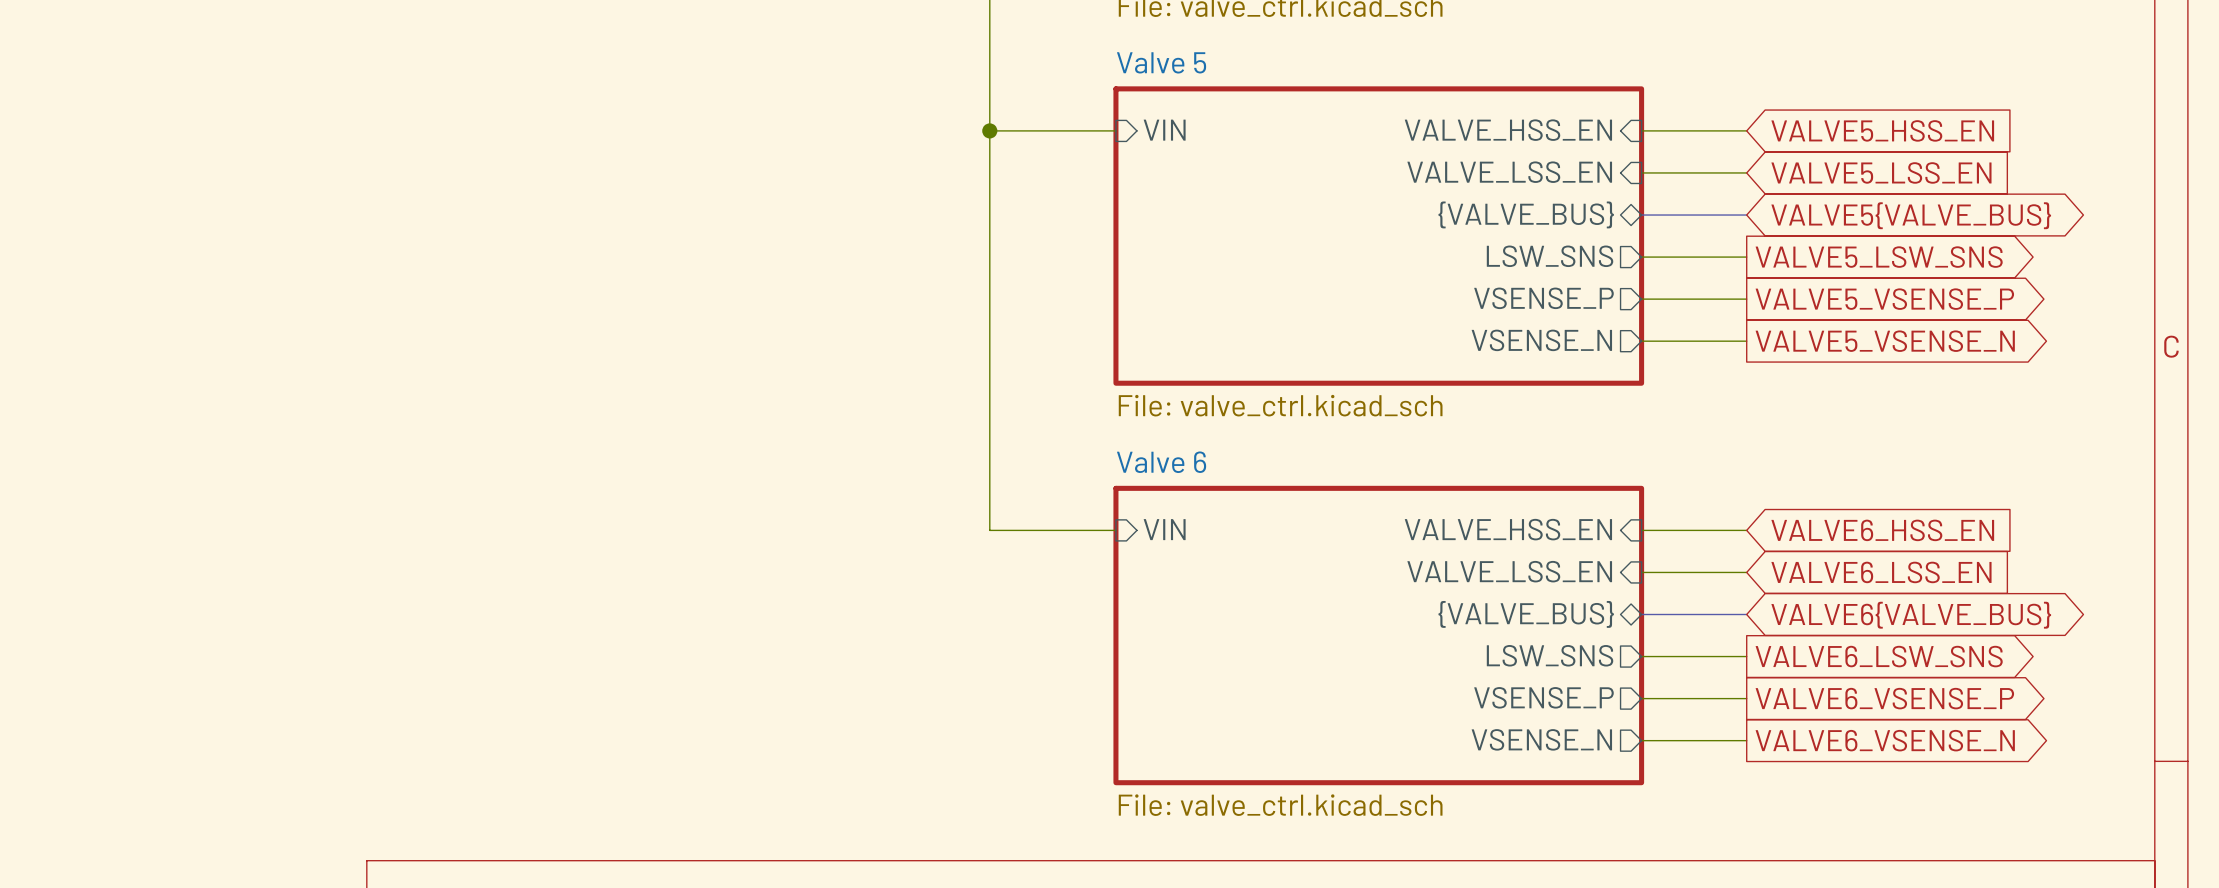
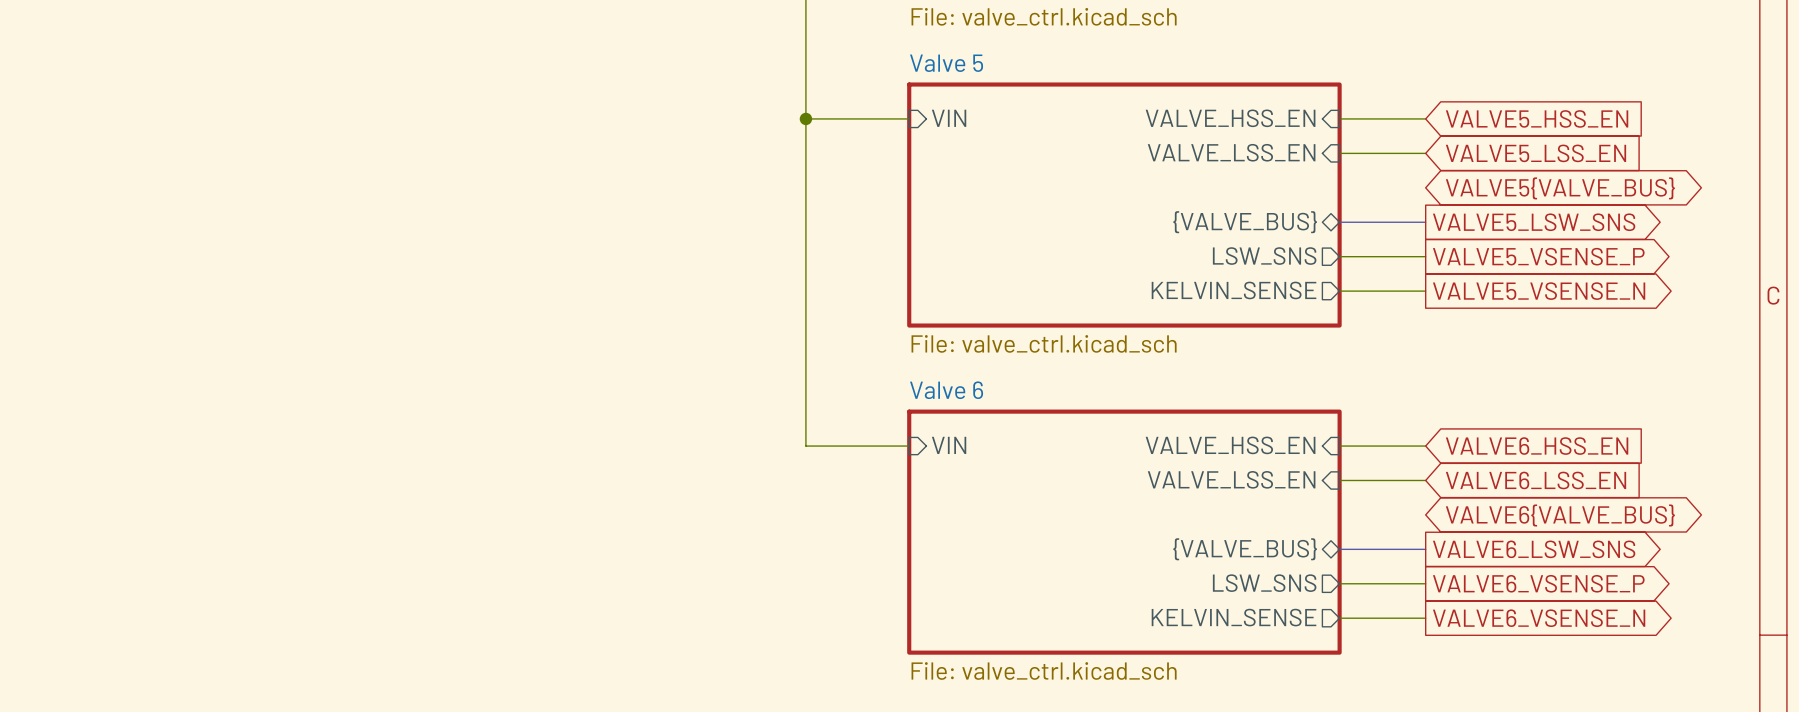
sheet pin: {VALVE_BUS} (1526, 214) -> none
bus: (1641, 215) (1746, 215) -> (1339, 222) (1425, 222)
sheet pin shape: output (1550, 256) -> bidirectional (1245, 222)
sheet pin: LSW_SNS (1550, 256) -> {VALVE_BUS} (1245, 222)
sheet pin: VSENSE_P (1543, 298) -> LSW_SNS (1264, 256)
sheet pin: VSENSE_N (1541, 340) -> KELVIN_SENSE (1234, 290)
sheet pin: {VALVE_BUS} (1526, 614) -> none
bus: (1641, 614) (1746, 614) -> (1339, 549) (1425, 549)
sheet pin shape: output (1550, 655) -> bidirectional (1245, 549)
sheet pin: LSW_SNS (1550, 655) -> {VALVE_BUS} (1245, 549)
sheet pin: VSENSE_P (1543, 697) -> LSW_SNS (1264, 583)
sheet pin: VSENSE_N (1541, 739) -> KELVIN_SENSE (1234, 617)

